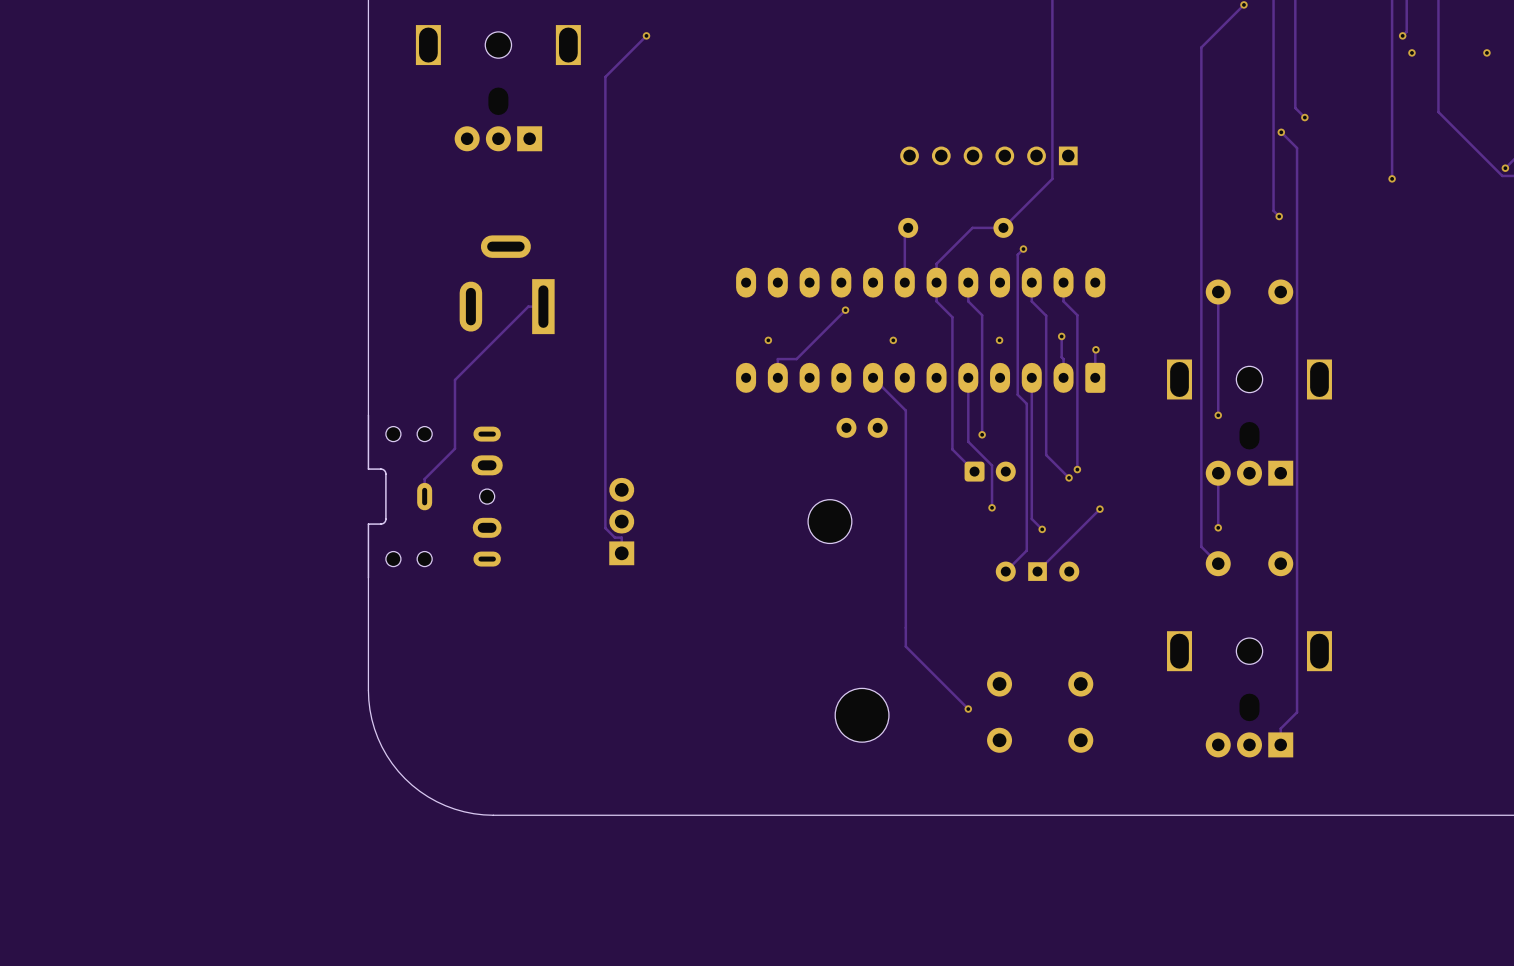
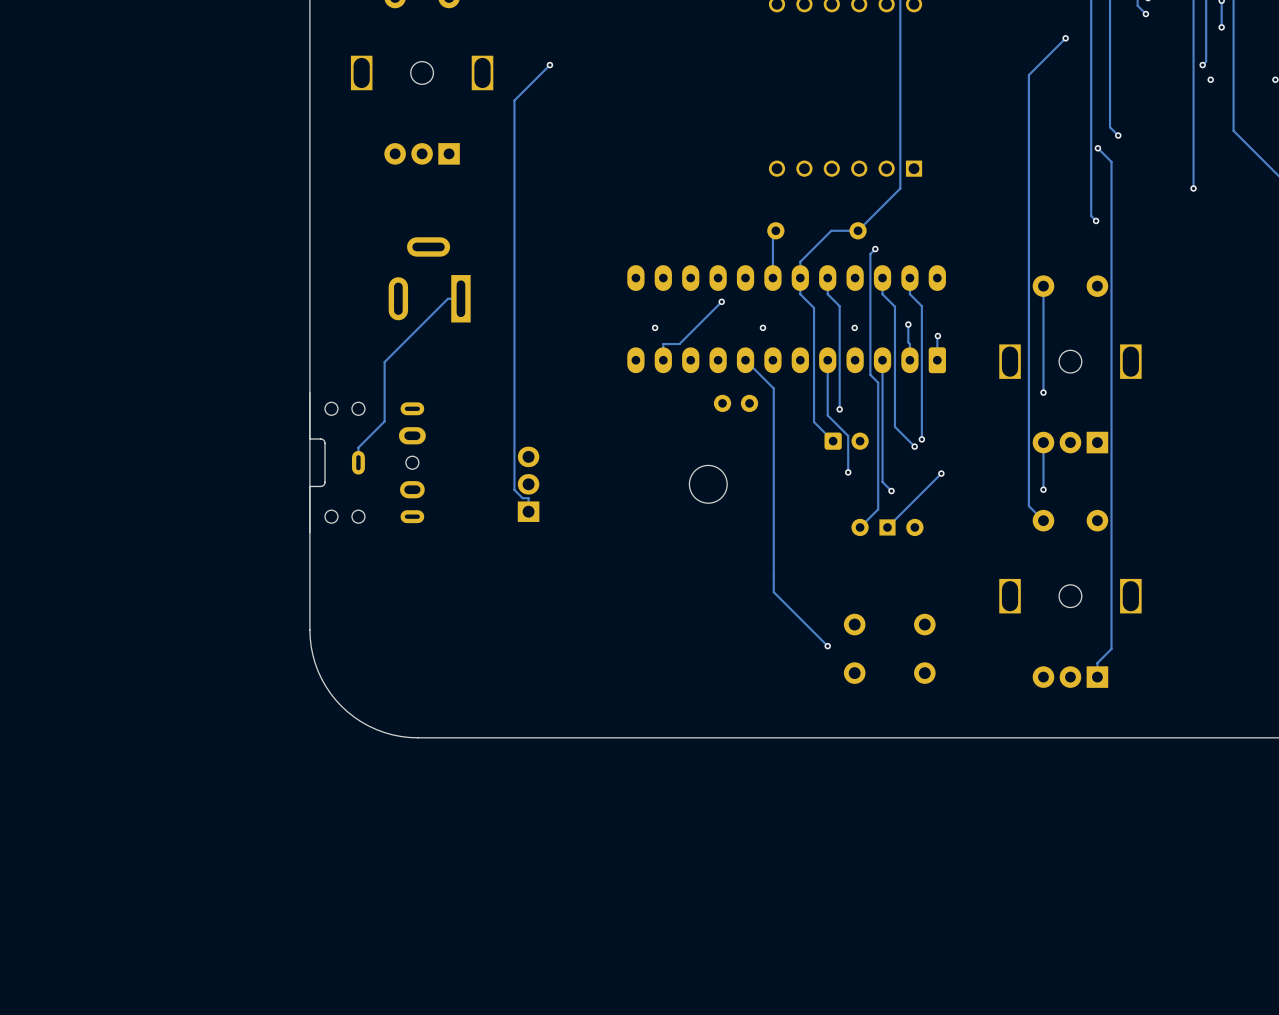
board edge: none -> (309, 392) (309, 532)
part: (862, 715) -> none

